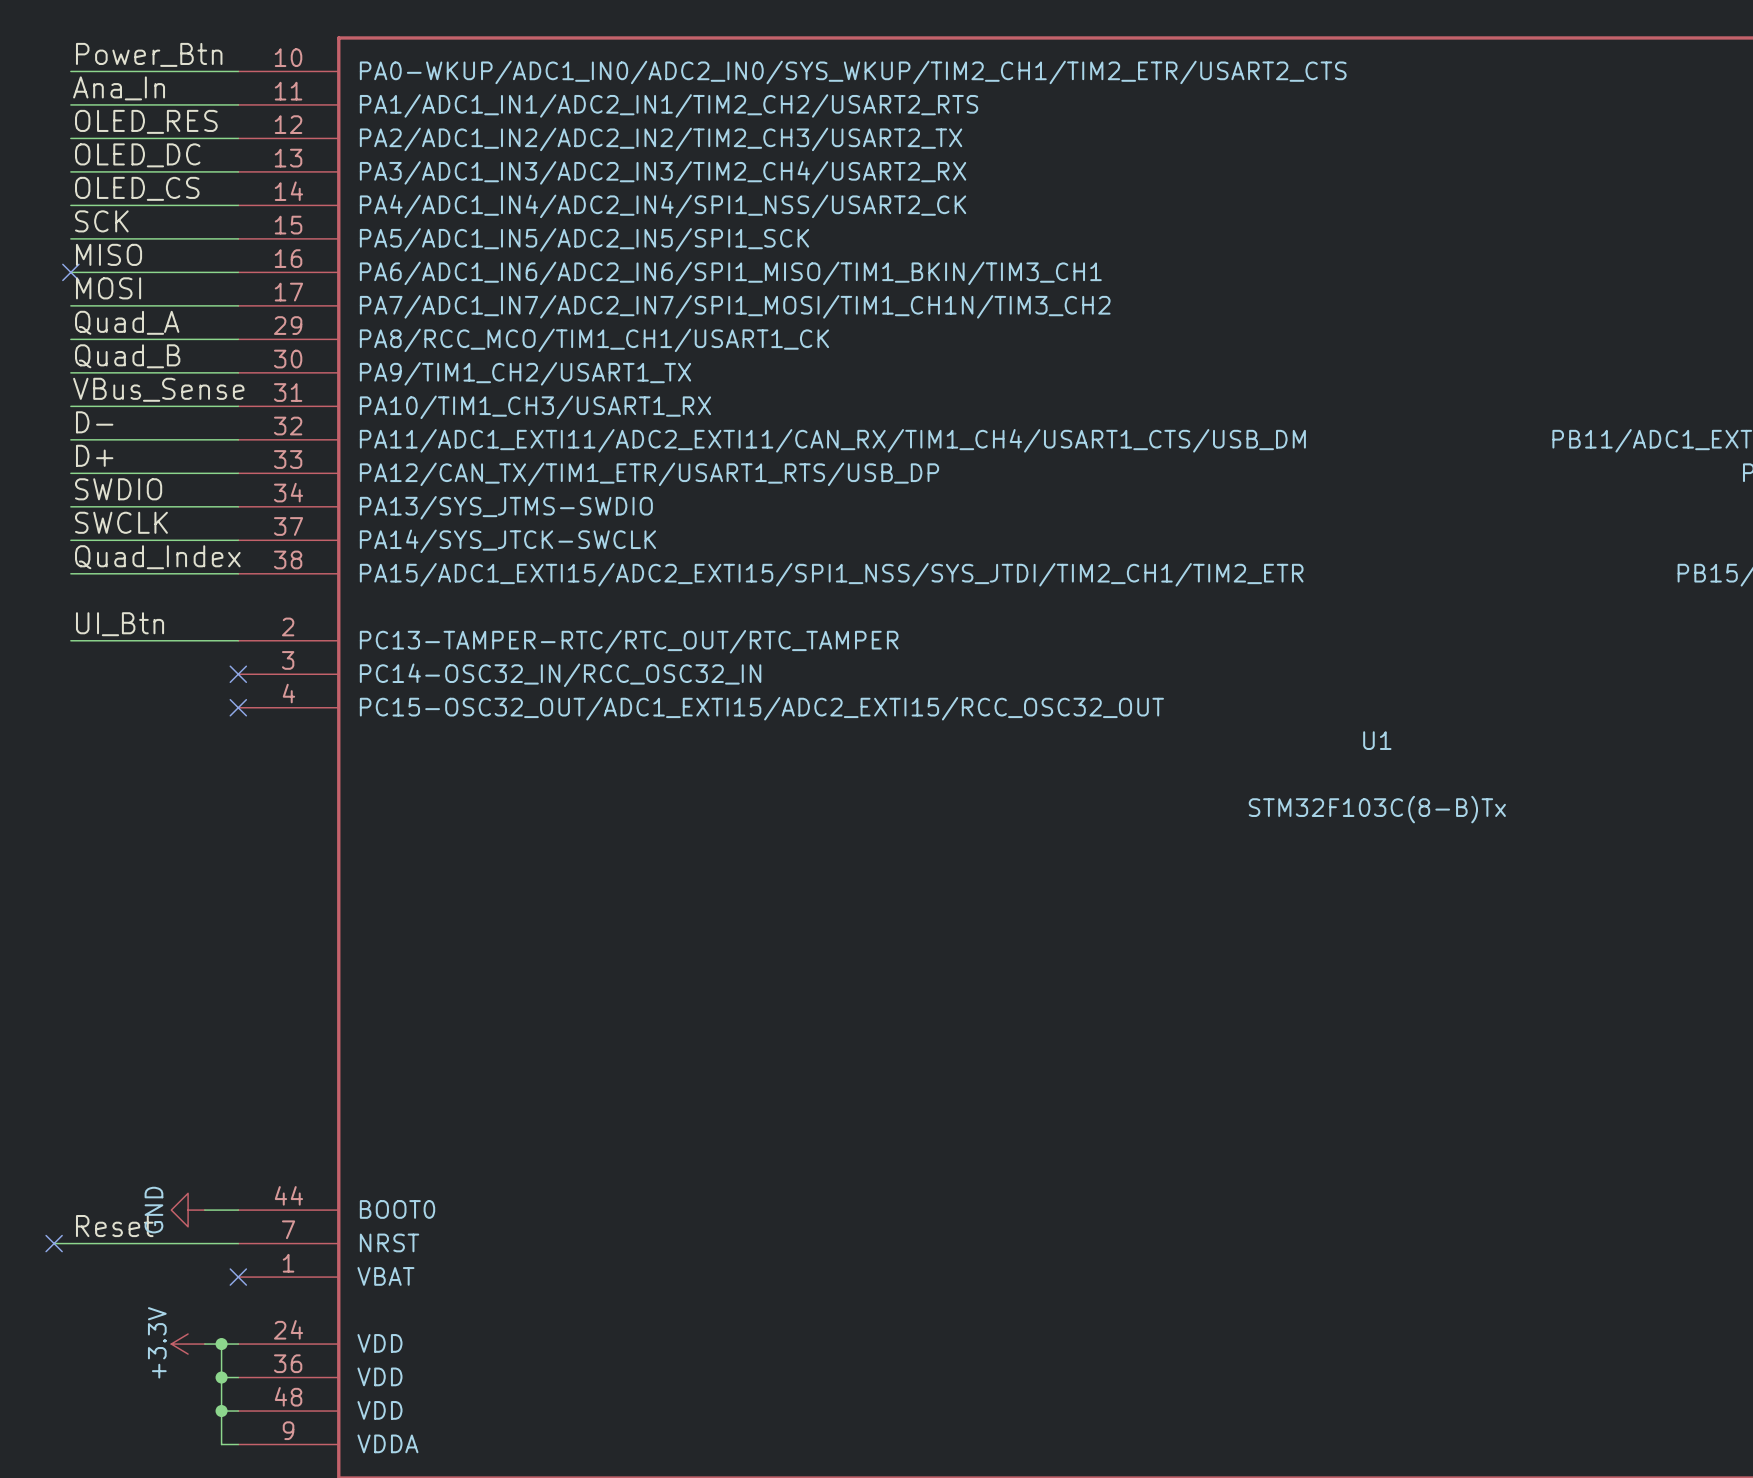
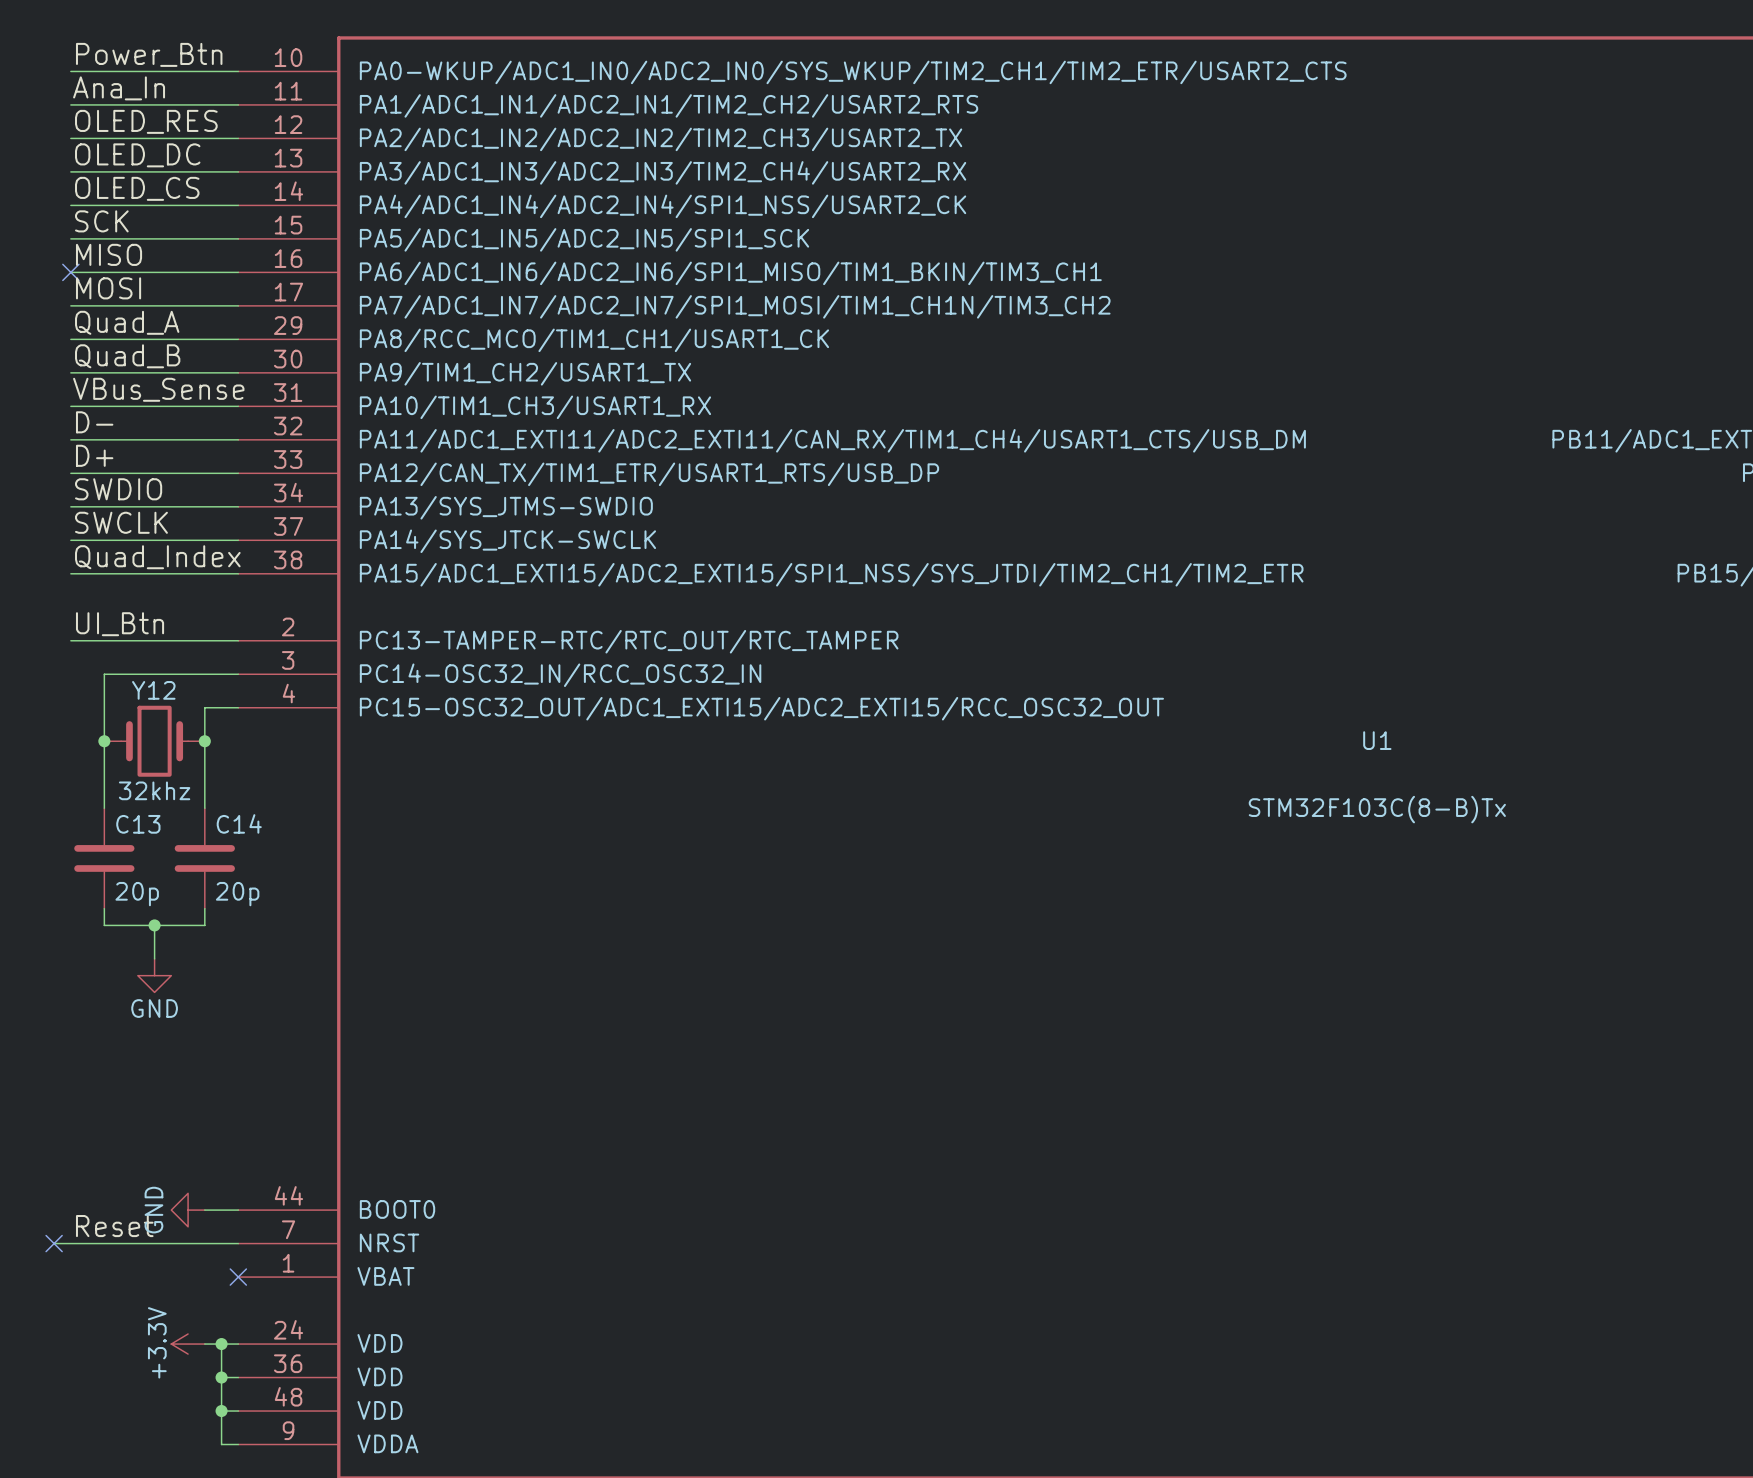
wire: none -> (238, 674) (104, 674) (104, 808)
no-connect mark: (238, 674) -> none
wire: none -> (238, 707) (204, 707) (204, 808)
no-connect mark: (238, 707) -> none
junction: none -> (104, 741)
Y12: none -> 32khz (154, 741)
junction: none -> (204, 741)
C13: none -> 20p (104, 858)
C14: none -> 20p (204, 858)
wire: none -> (104, 908) (104, 925) (204, 925) (204, 908)
wire: none -> (154, 925) (154, 958)
junction: none -> (154, 925)
power symbol: none -> GND (154, 975)

